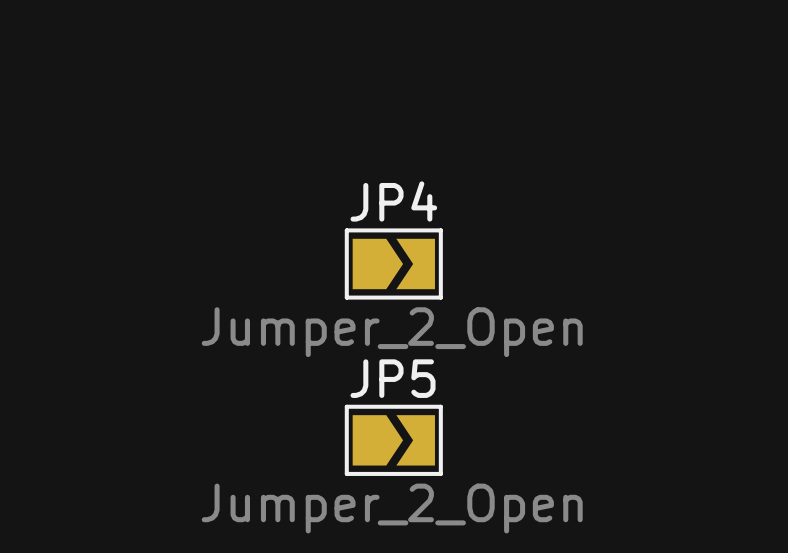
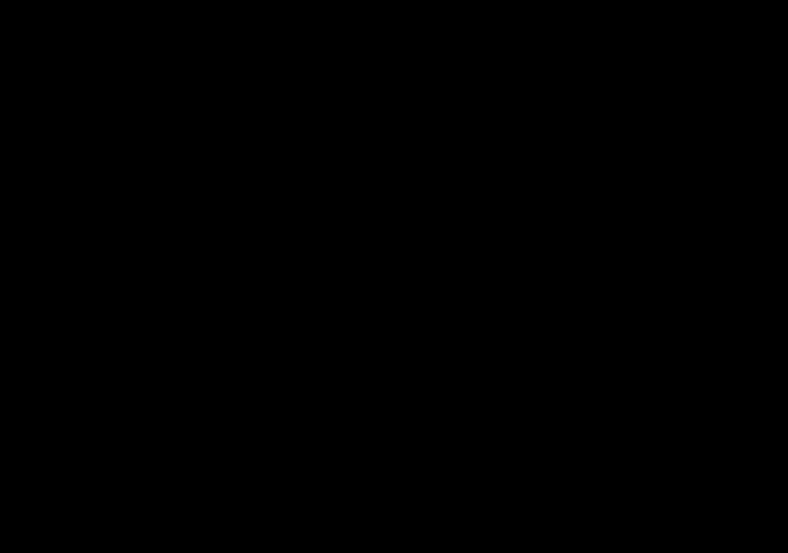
JP4: Jumper_2_Open (393, 263) -> none
JP5: Jumper_2_Open (393, 440) -> none

